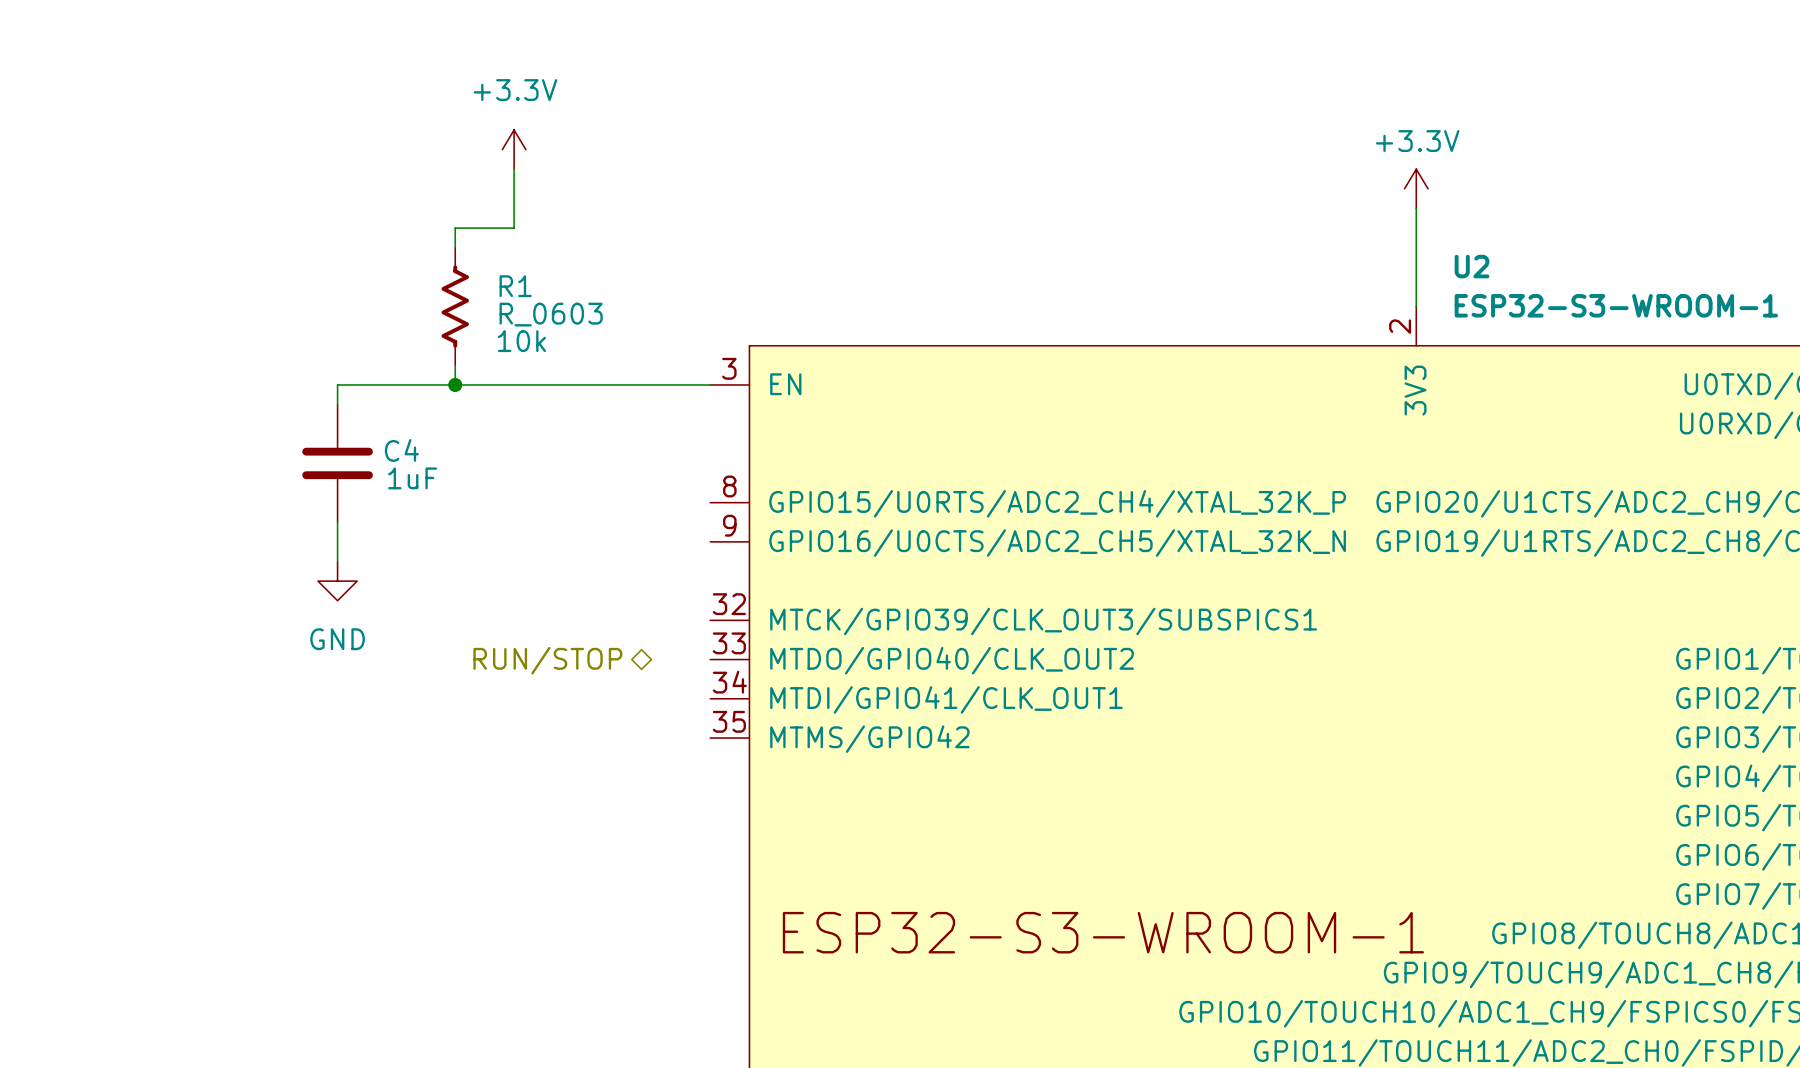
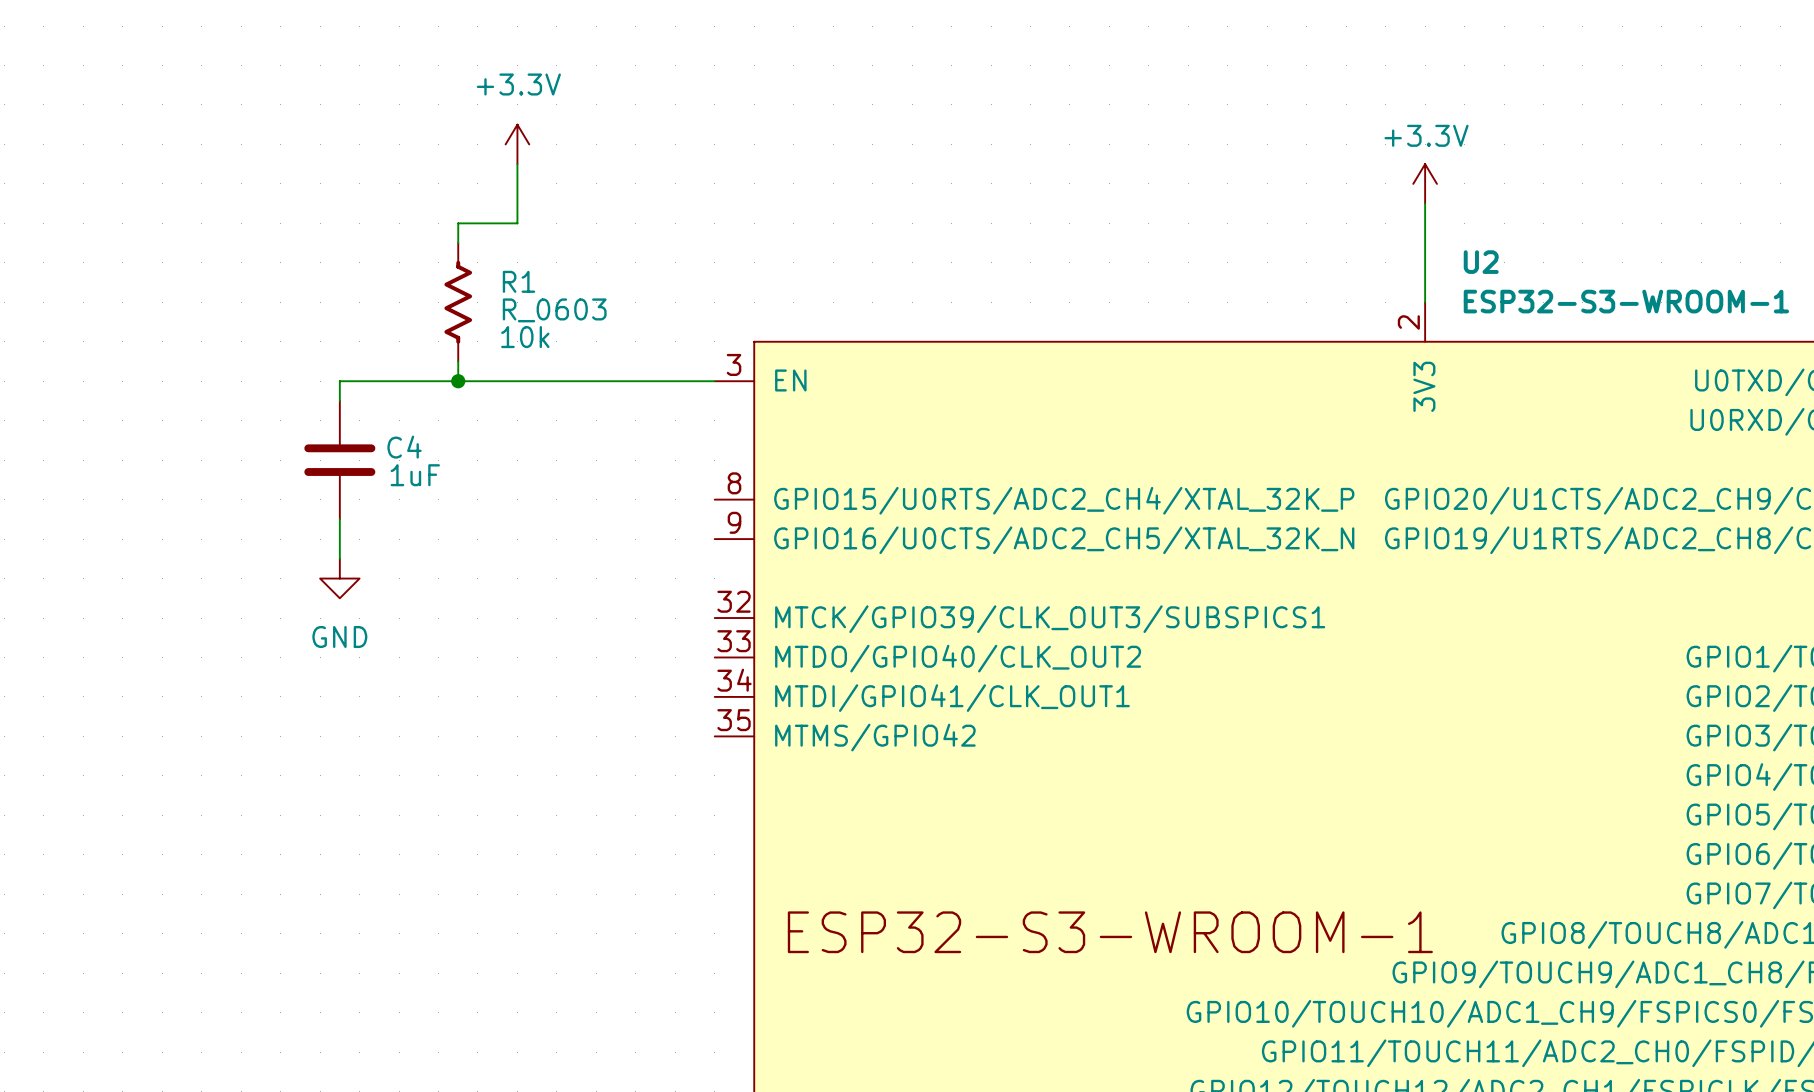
hierarchical label: RUN/STOP (547, 660) -> none

